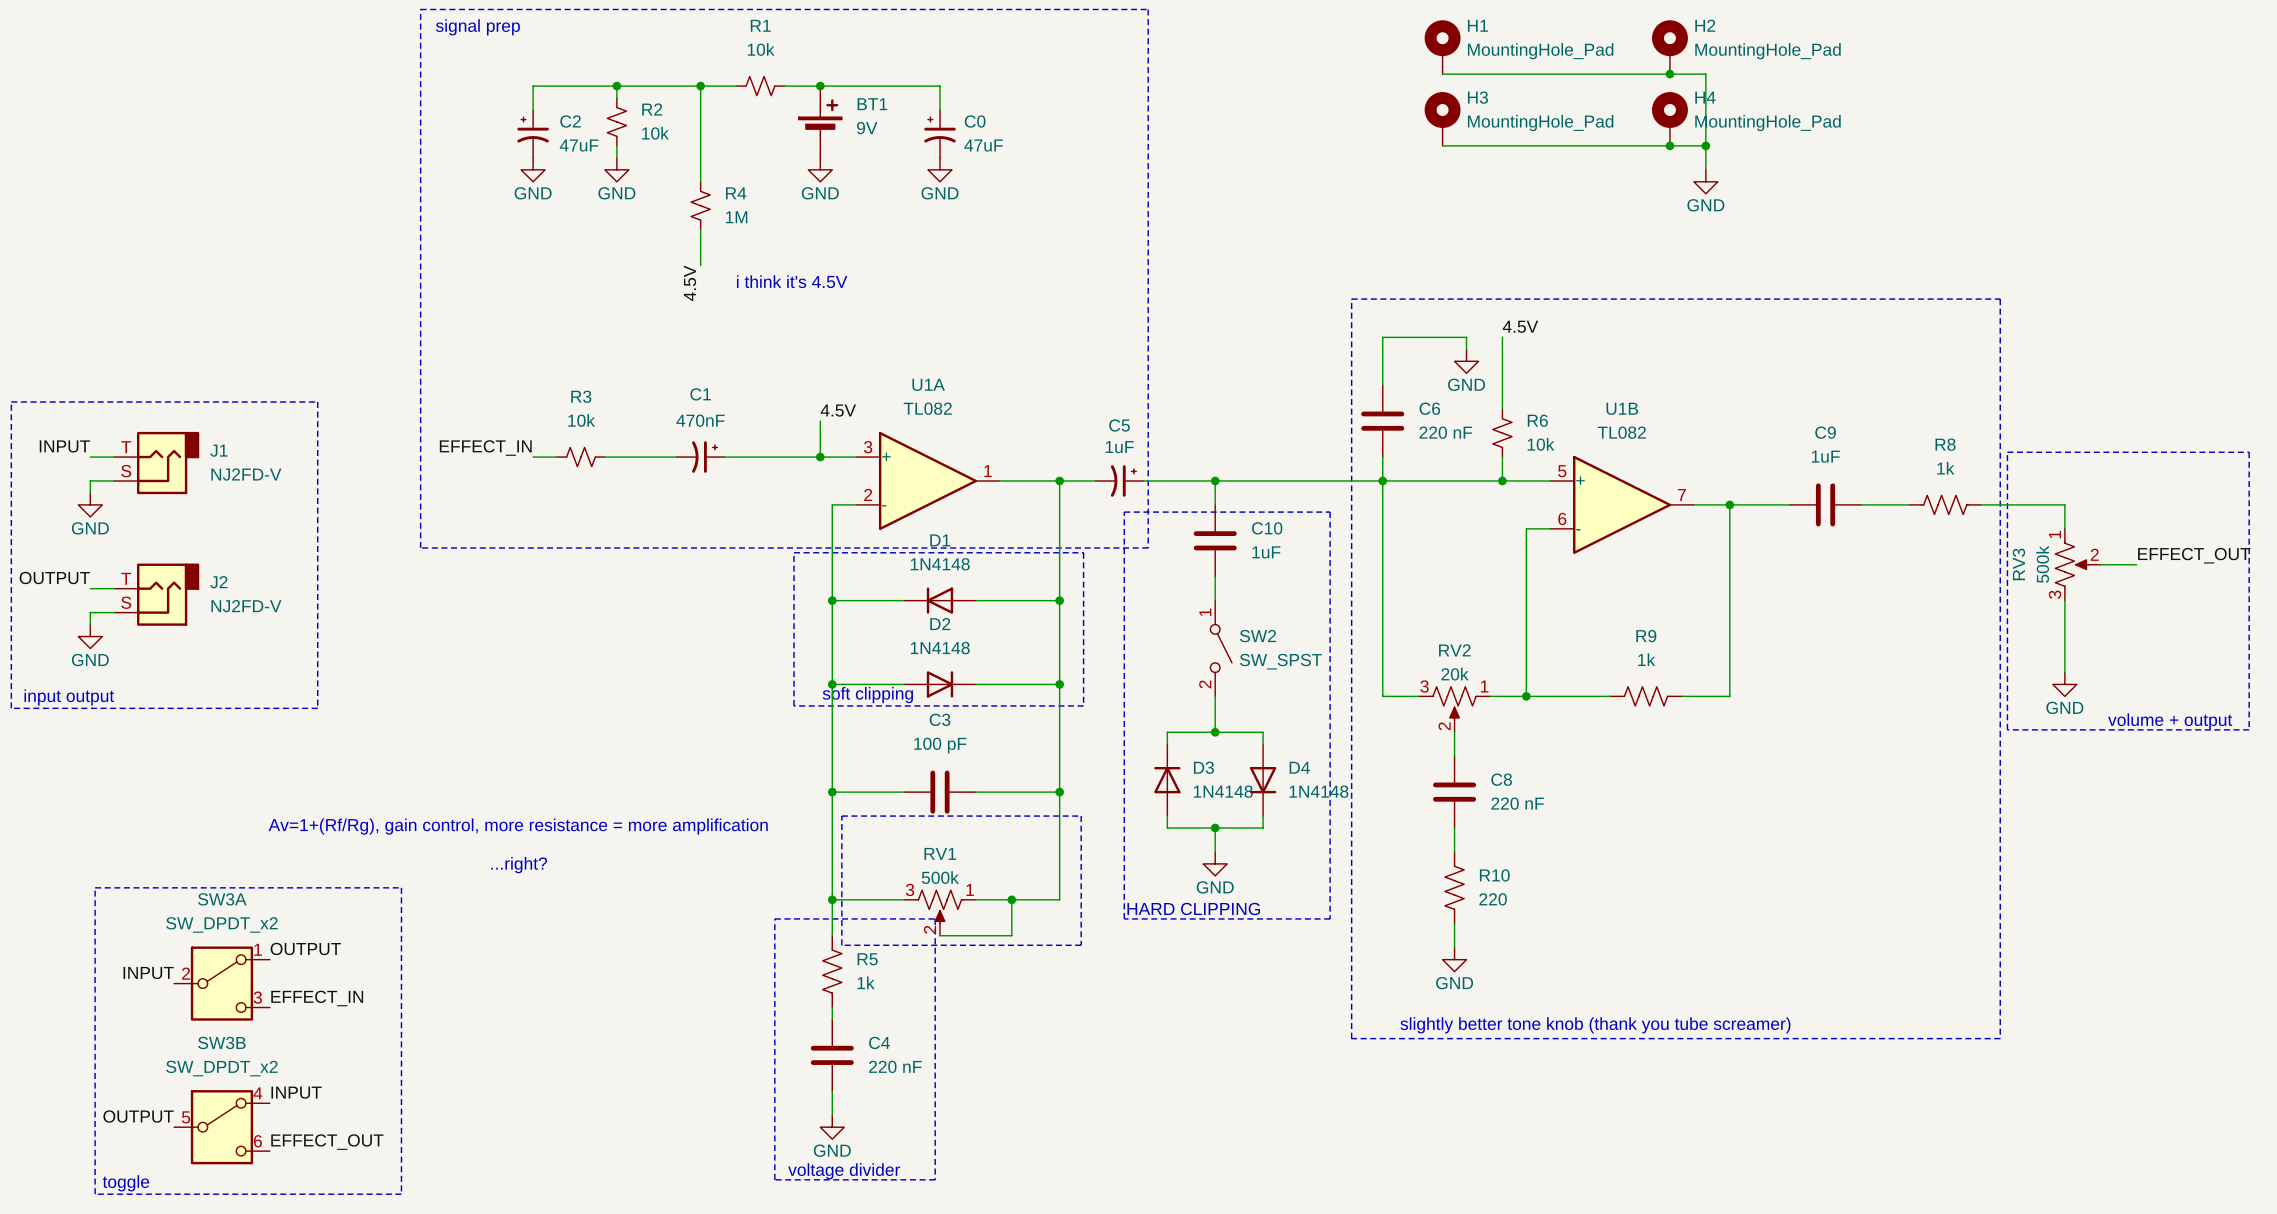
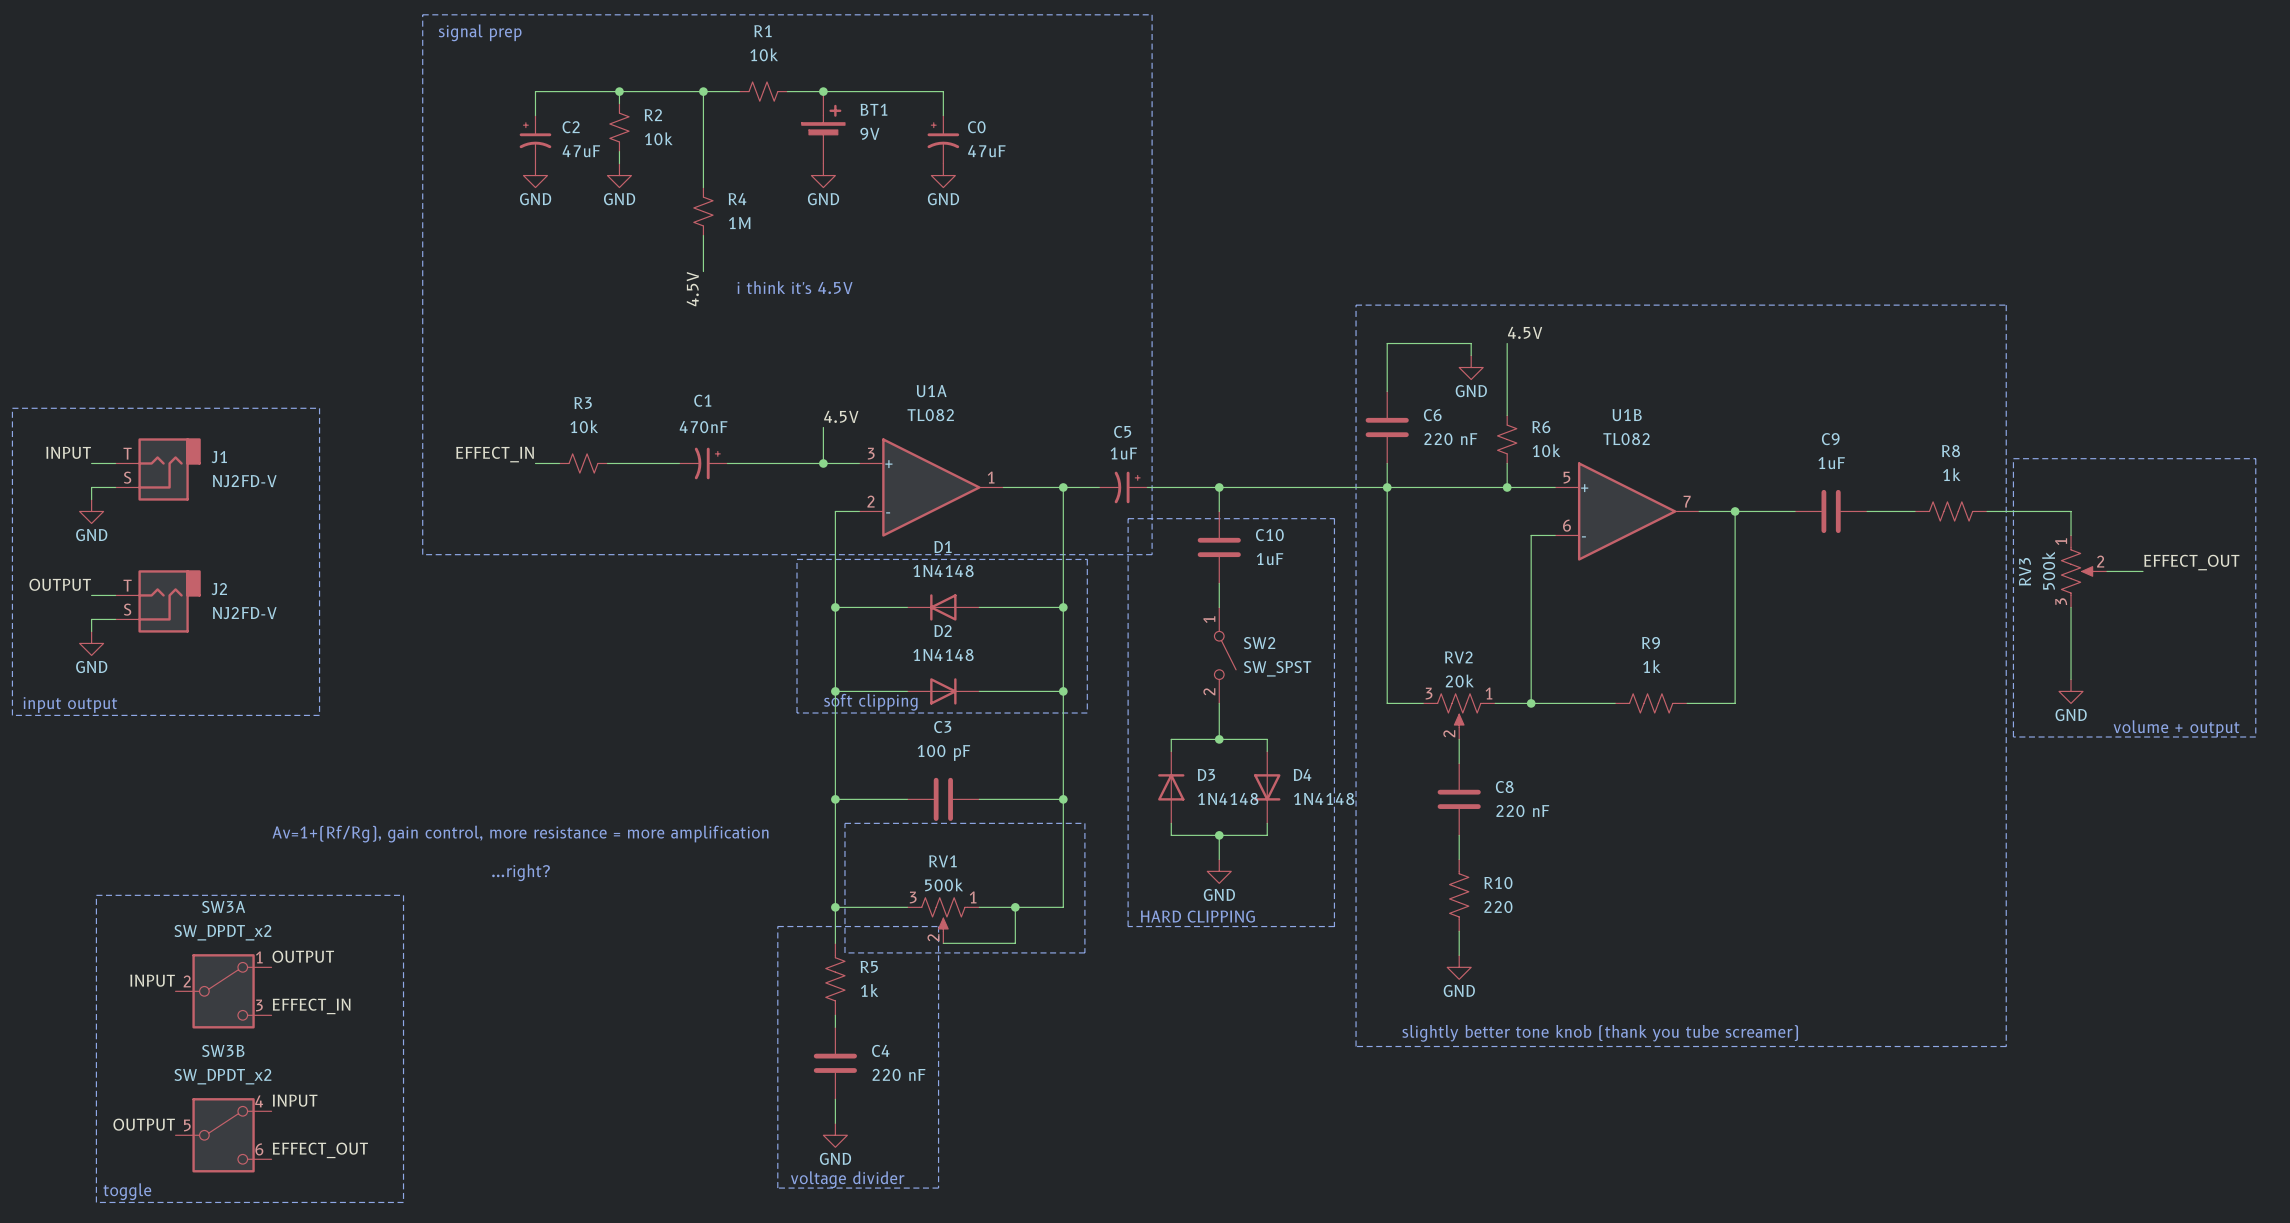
H1: MountingHole_Pad (1442, 47) -> none
H2: MountingHole_Pad (1669, 47) -> none
wire: (1442, 74) (1705, 74) (1705, 169) -> none
junction: (1669, 74) -> none
H3: MountingHole_Pad (1442, 118) -> none
H4: MountingHole_Pad (1669, 118) -> none
wire: (1442, 145) (1705, 145) -> none
junction: (1669, 145) -> none
junction: (1705, 145) -> none
power symbol: GND (1705, 181) -> none

